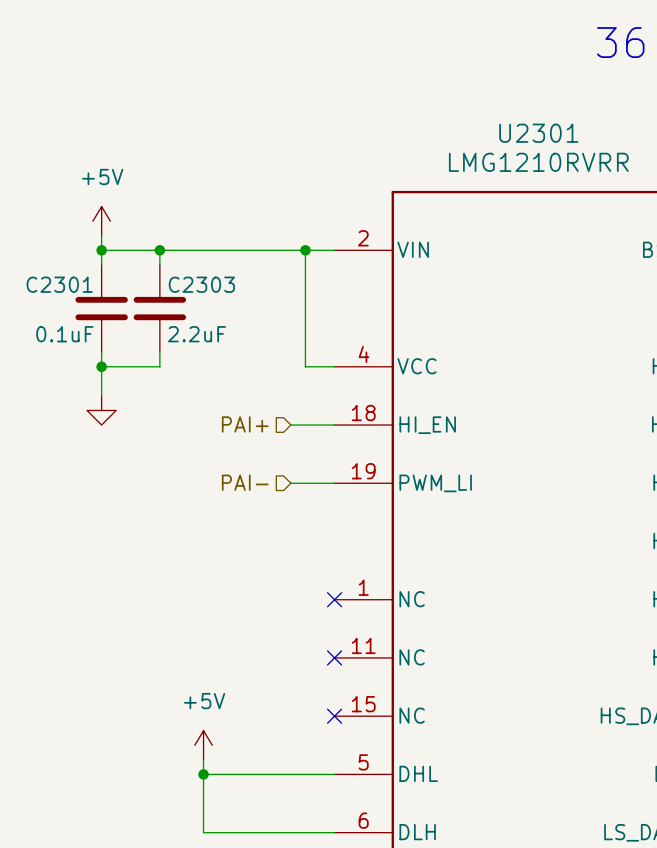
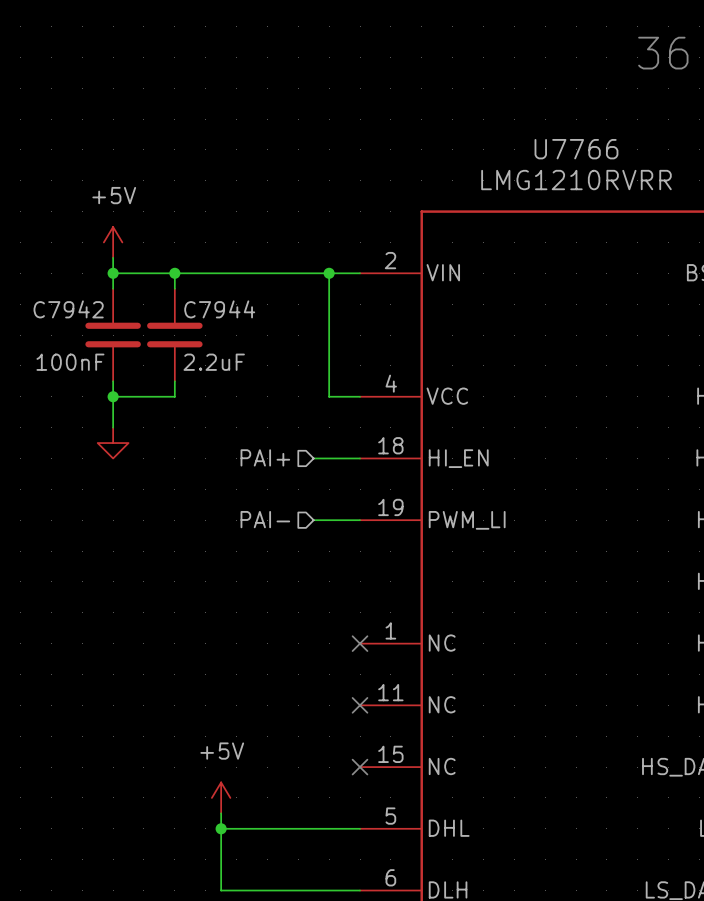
U2301 name: U2301 (538, 133) -> U7766 (576, 149)
C2301 name: C2301 (59, 284) -> C7942 (68, 309)
C2303 name: C2303 (201, 284) -> C7944 (219, 309)
C2301 value: 0.1uF (64, 334) -> 100nF (70, 362)

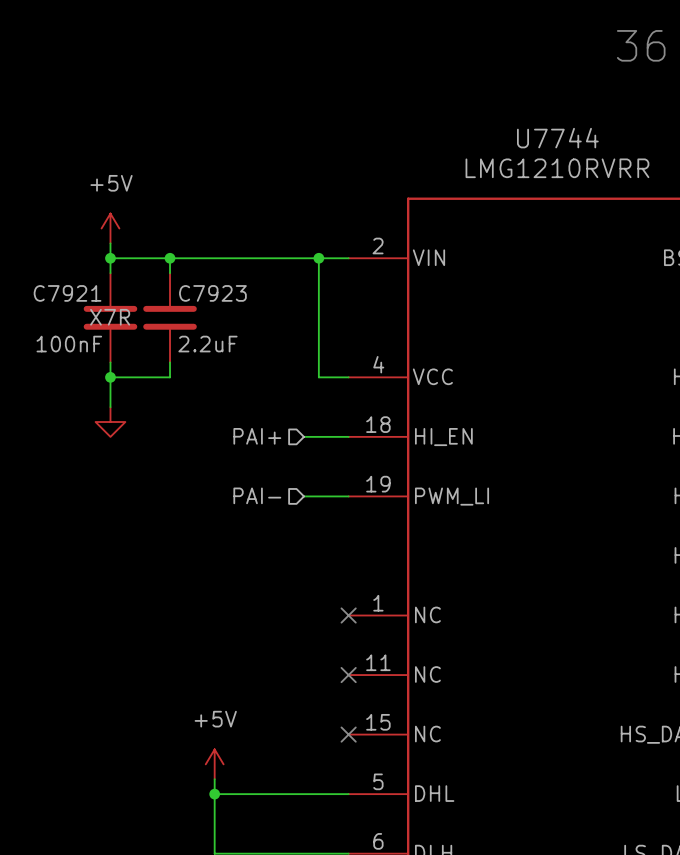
U7766 name: U7766 (576, 149) -> U7744 (557, 138)
C7942 name: C7942 (68, 309) -> C7921 (67, 293)
C7944 name: C7944 (219, 309) -> C7923 (212, 293)
C7942 text: none -> X7R (110, 317)

